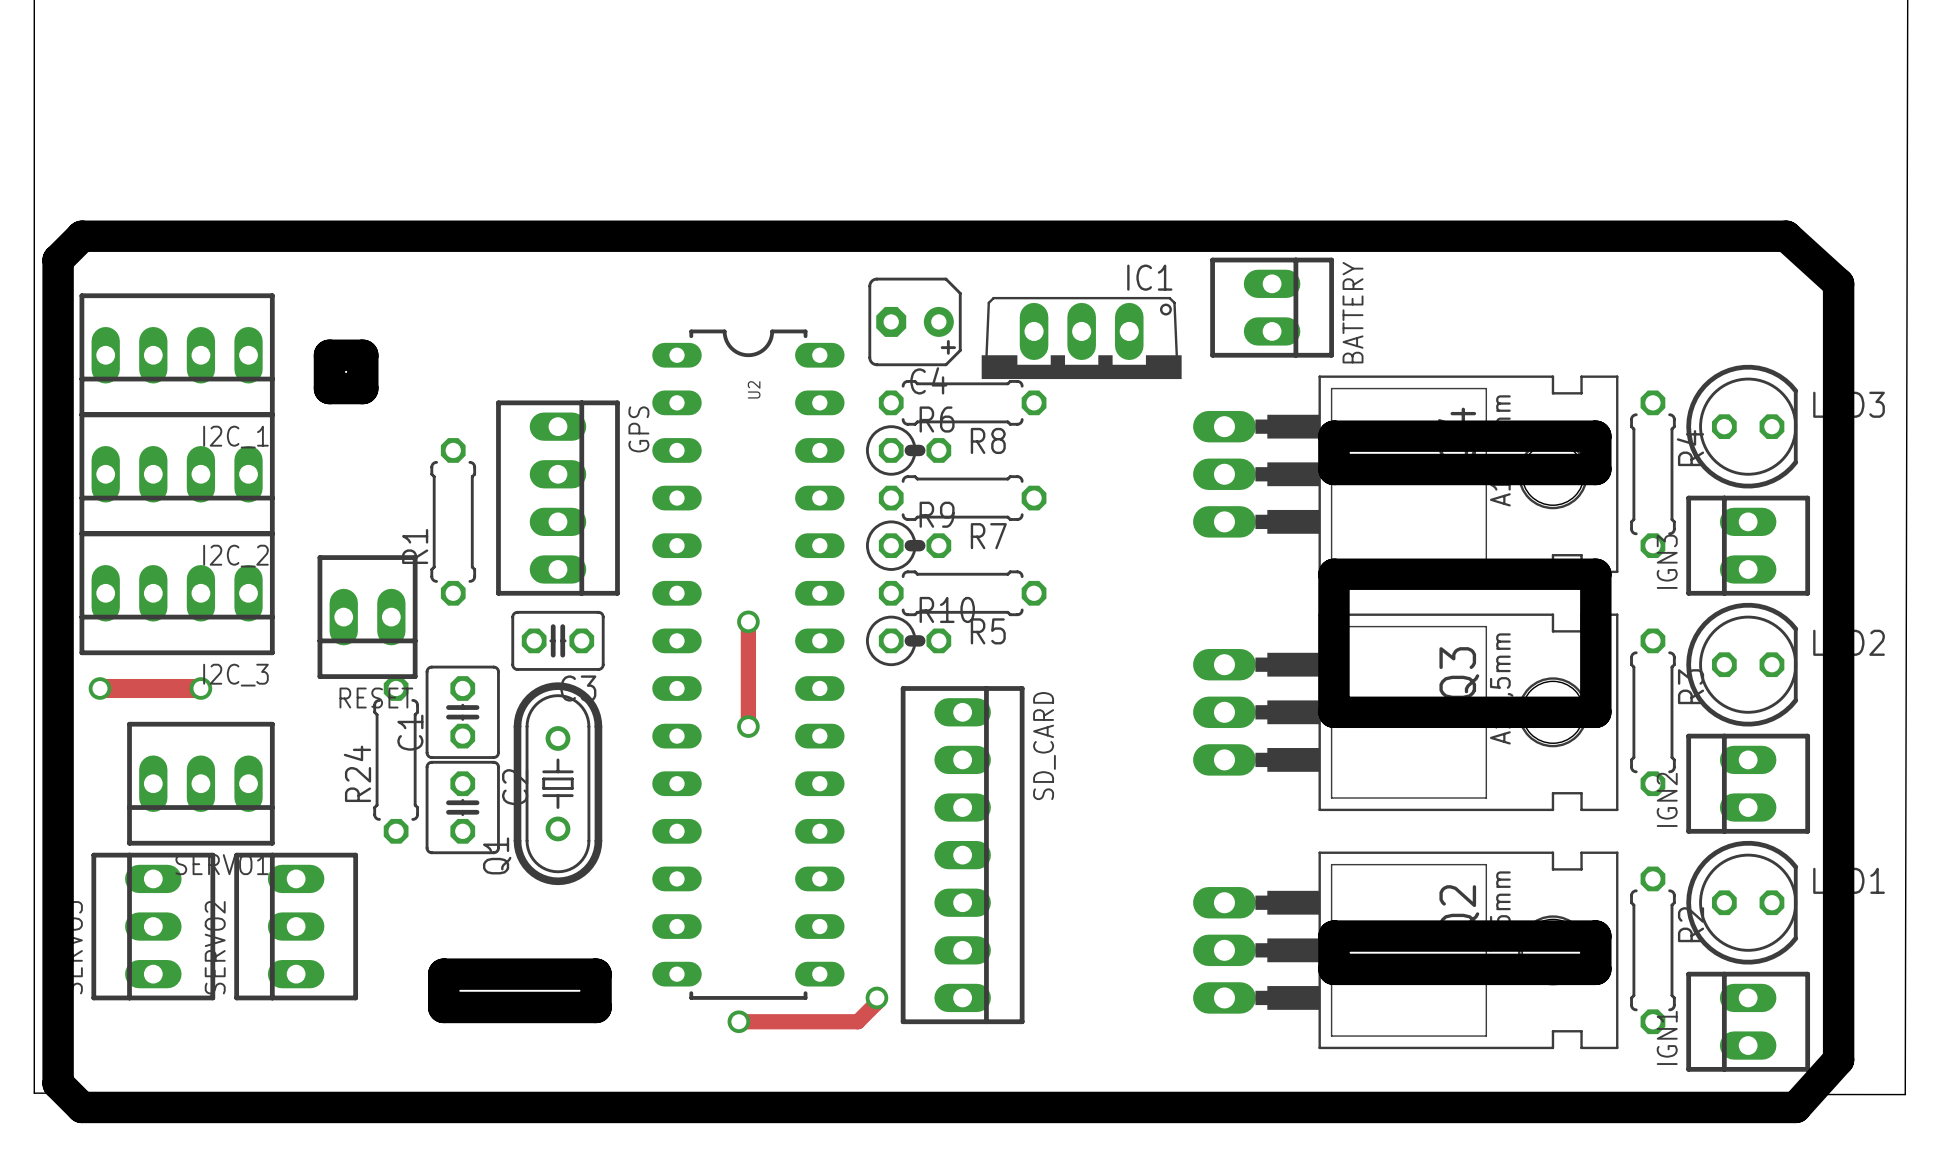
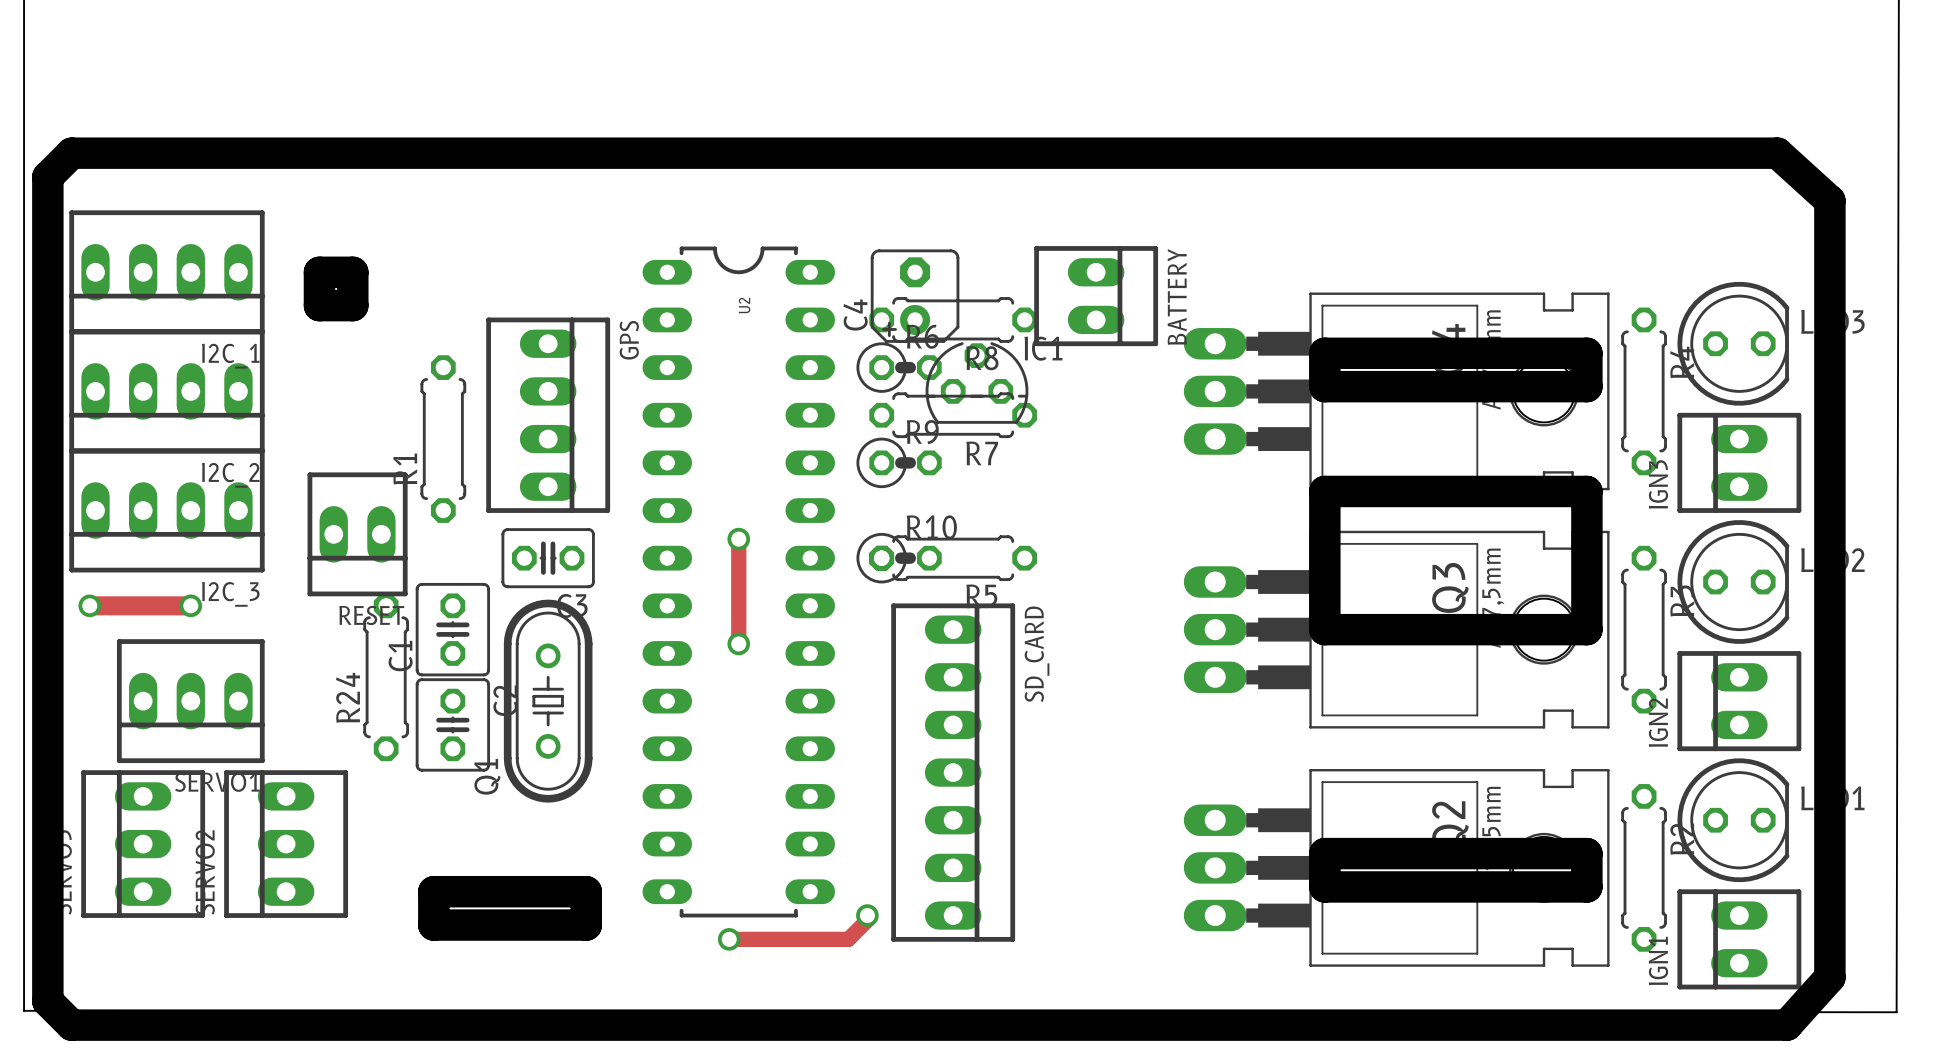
IC1 footprint: [981, 296, 1182, 380] -> [925, 342, 1029, 424]
BATTERY position: (1272, 307) -> (1096, 296)
C4 rotation: 0° (915, 321) -> 90° clockwise (915, 296)
C4 position: (915, 321) -> (915, 296)
R5 position: (962, 593) -> (953, 558)

